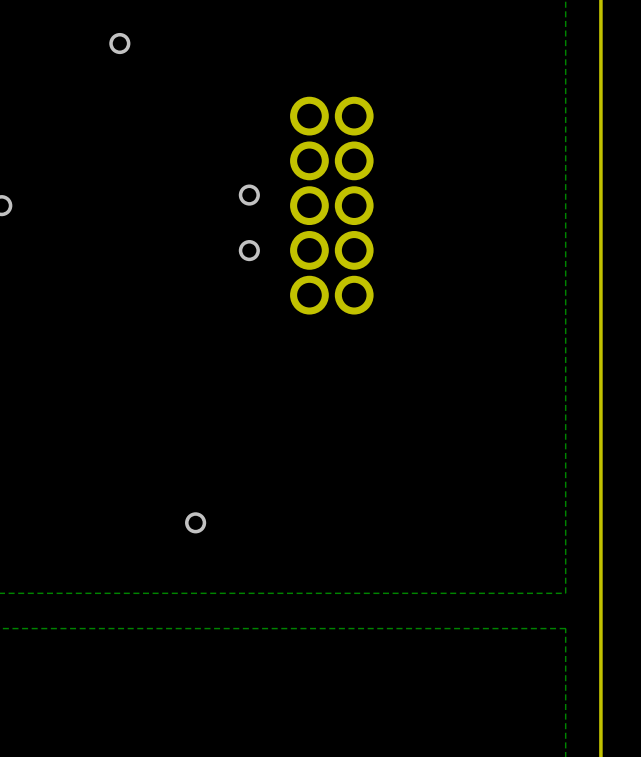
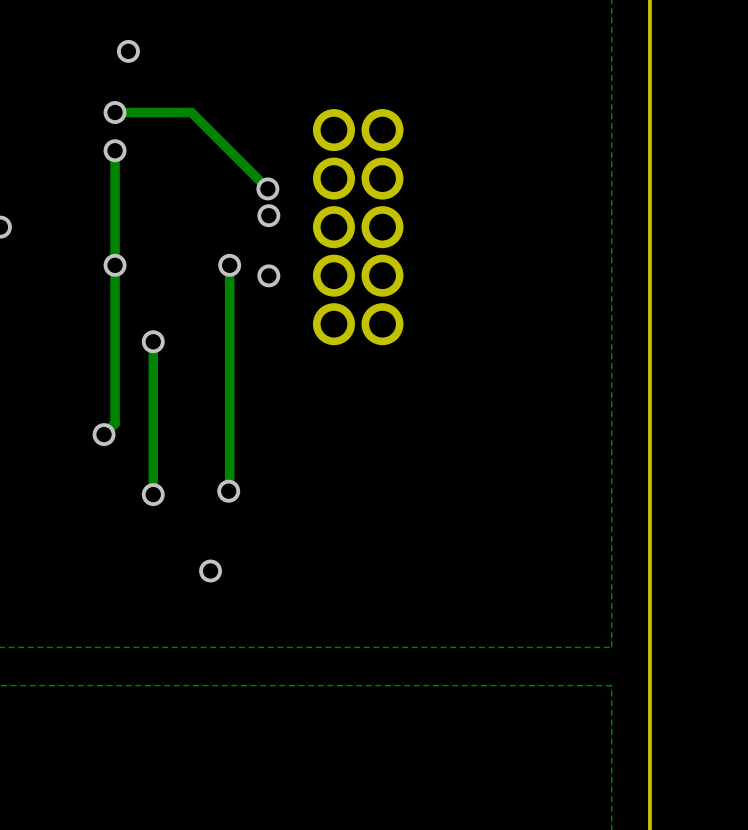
track: none -> (115, 112) (191, 112) (267, 188)
via: none -> (115, 112)
track: none -> (115, 150) (115, 423) (104, 434)
via: none -> (115, 150)
via: none -> (267, 188)
via: none -> (115, 265)
track: none -> (229, 265) (228, 491)
via: none -> (229, 265)
track: none -> (153, 341) (153, 494)
via: none -> (153, 341)
via: none -> (104, 434)
via: none -> (228, 491)
via: none -> (153, 494)

